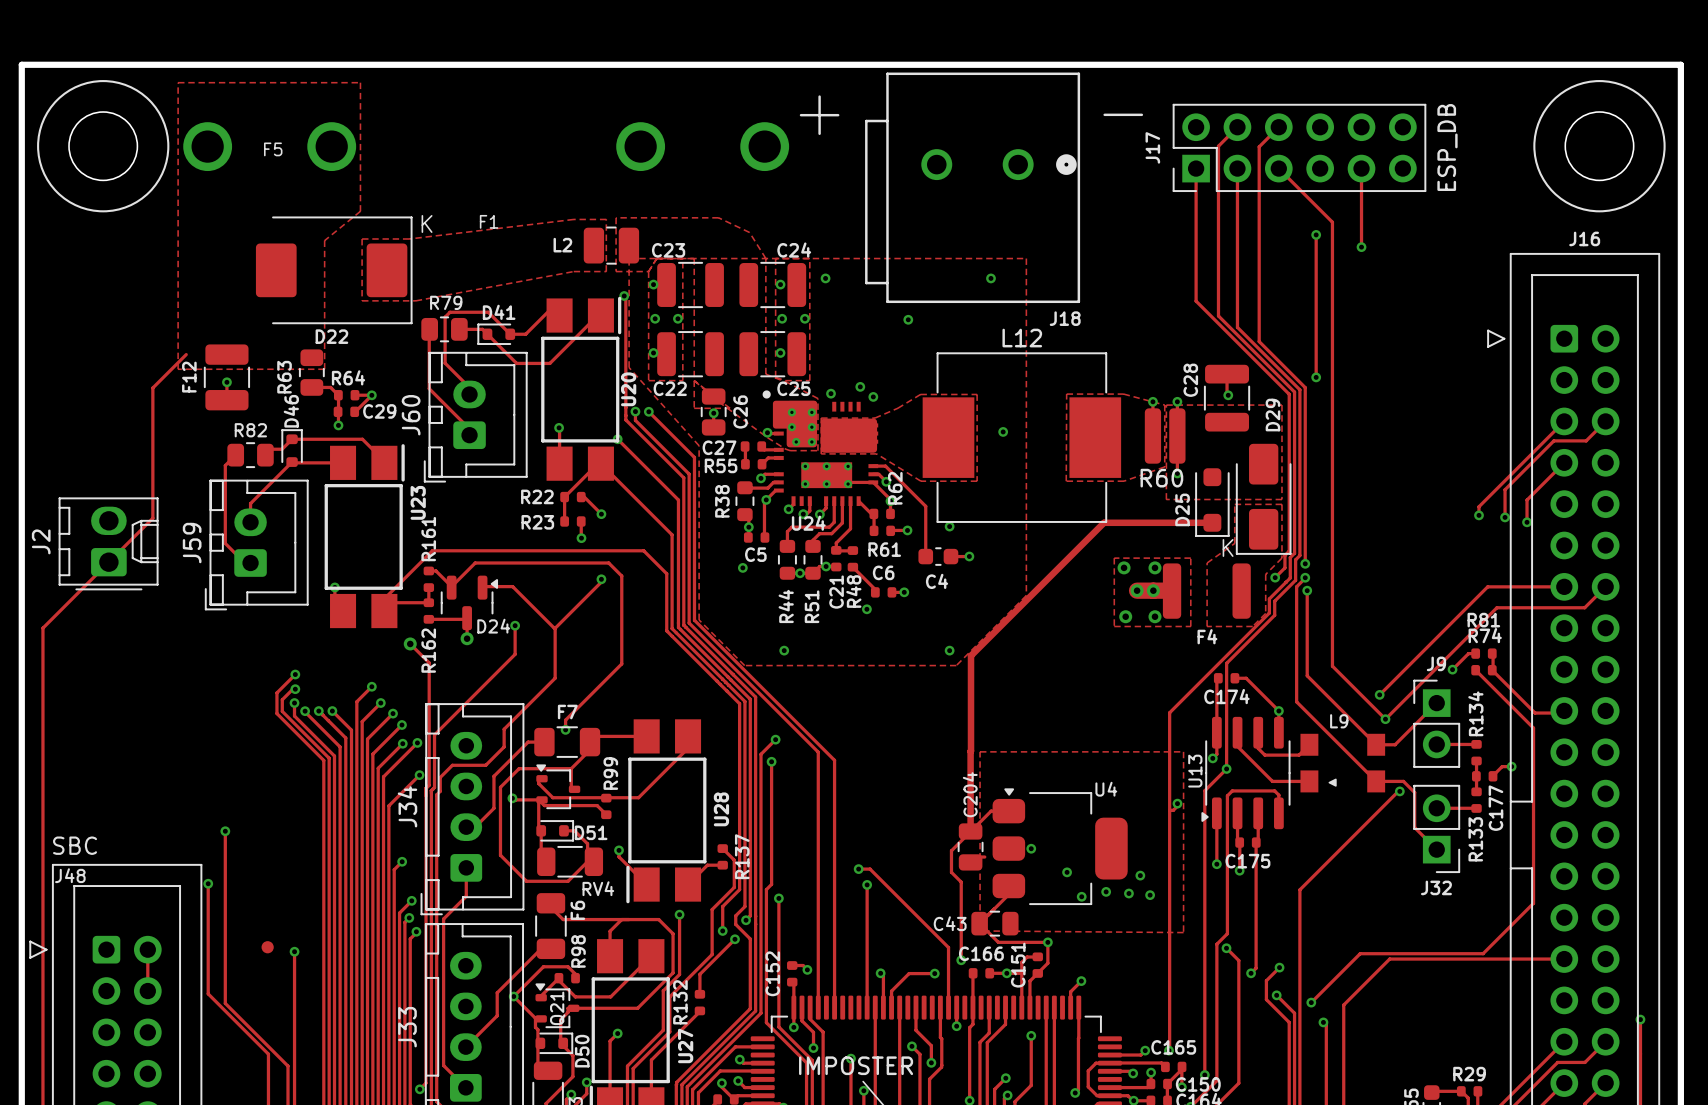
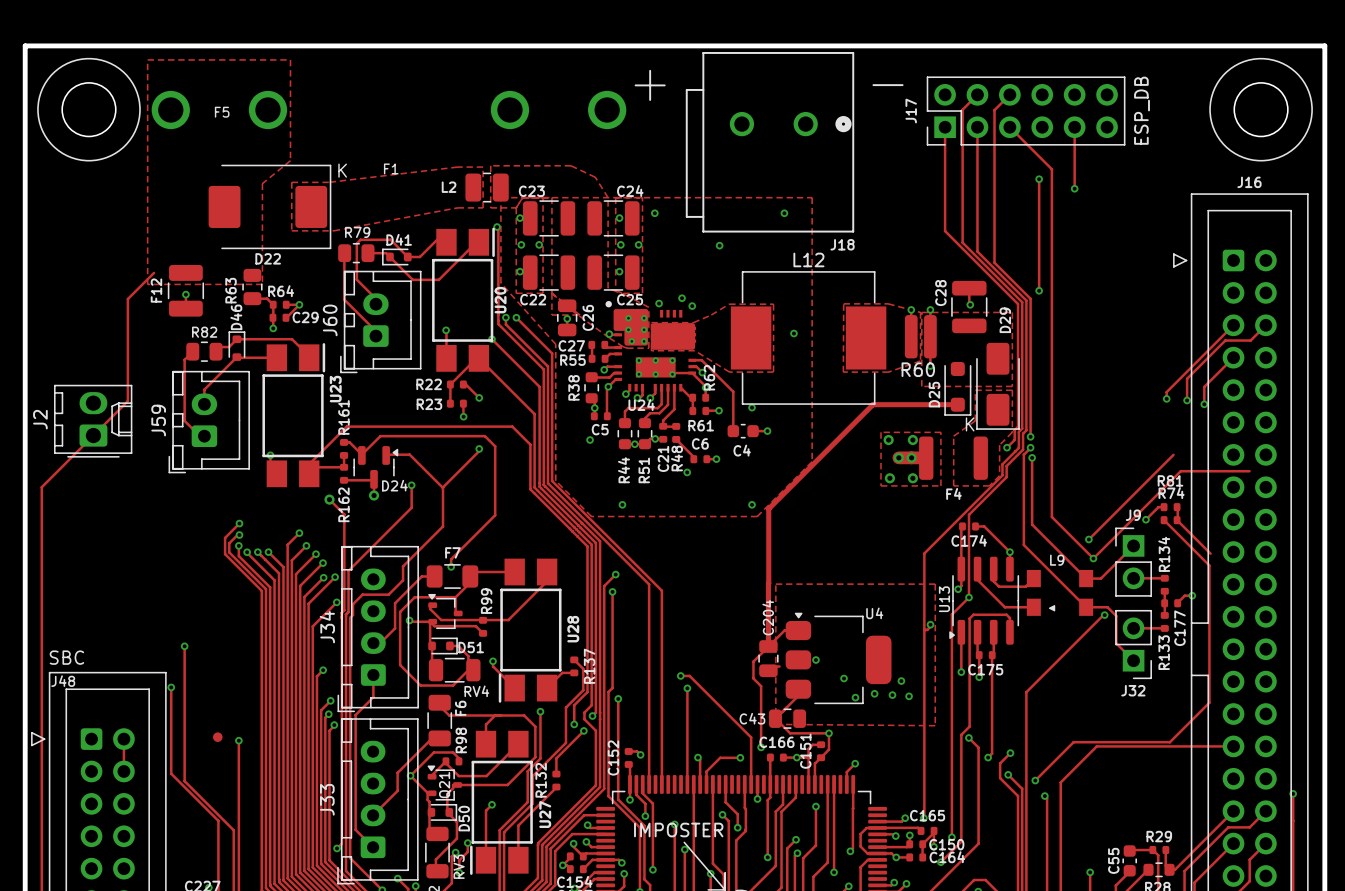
track: (1487, 586) (1564, 586) -> none
track: (1605, 586) (1584, 607) -> none
track: (1535, 713) (1562, 713) -> none

